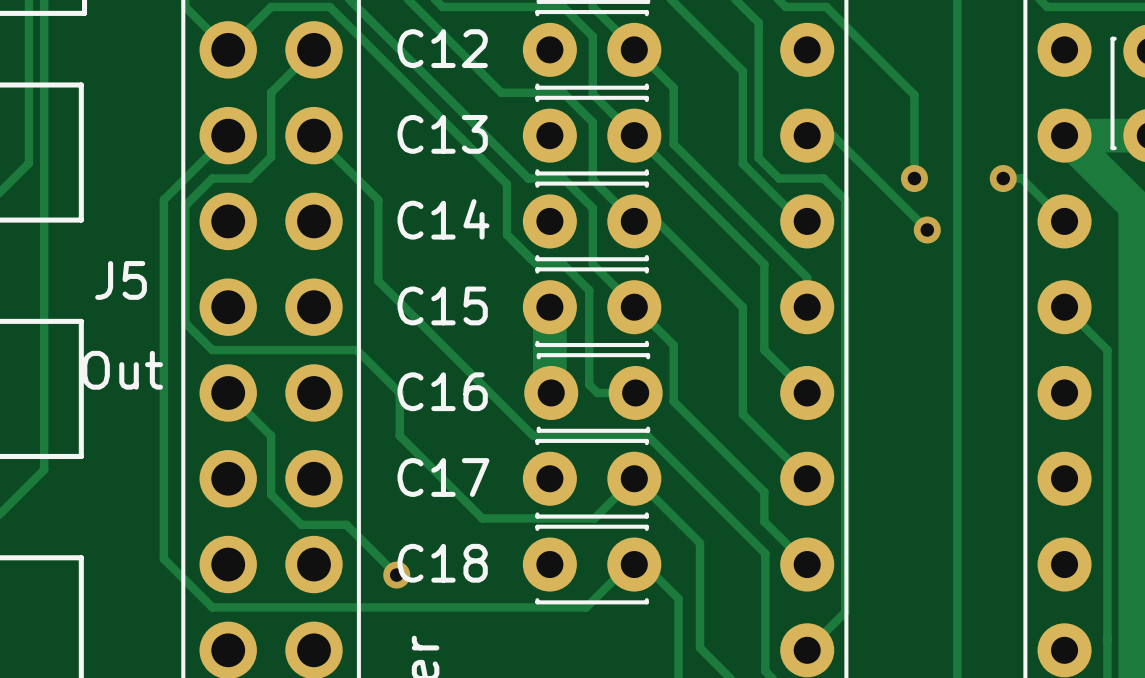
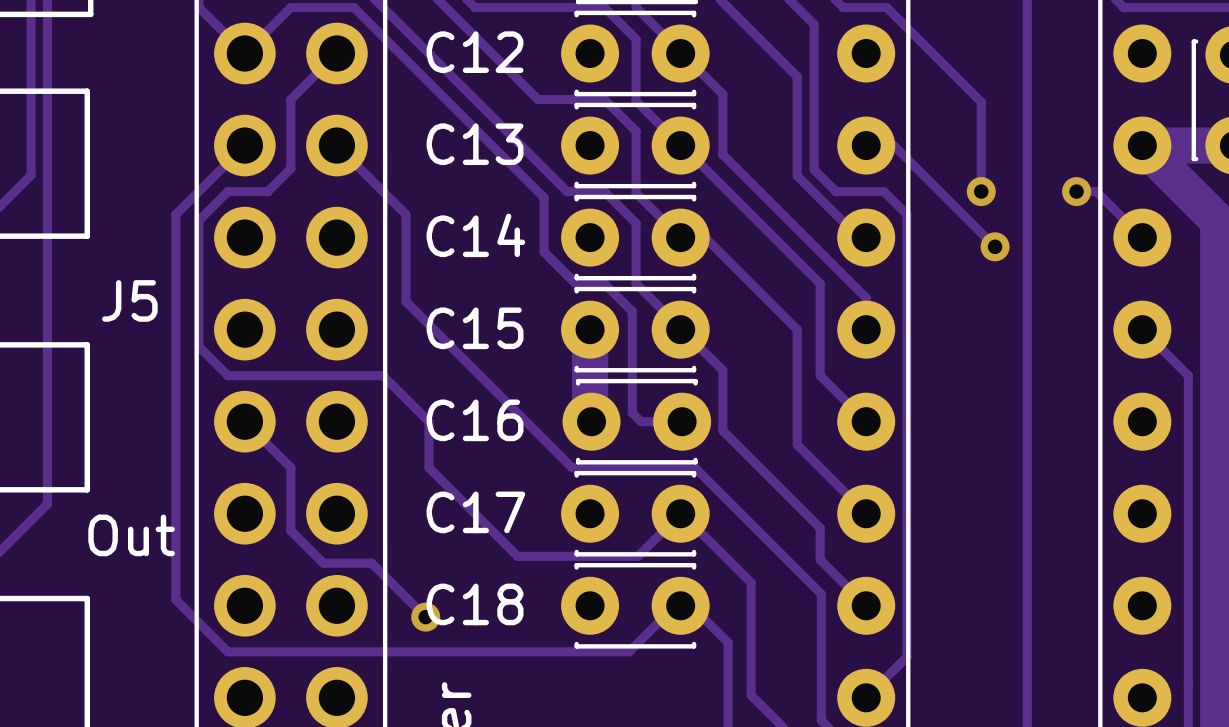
text position: Out (122, 370) -> Out (131, 535)

